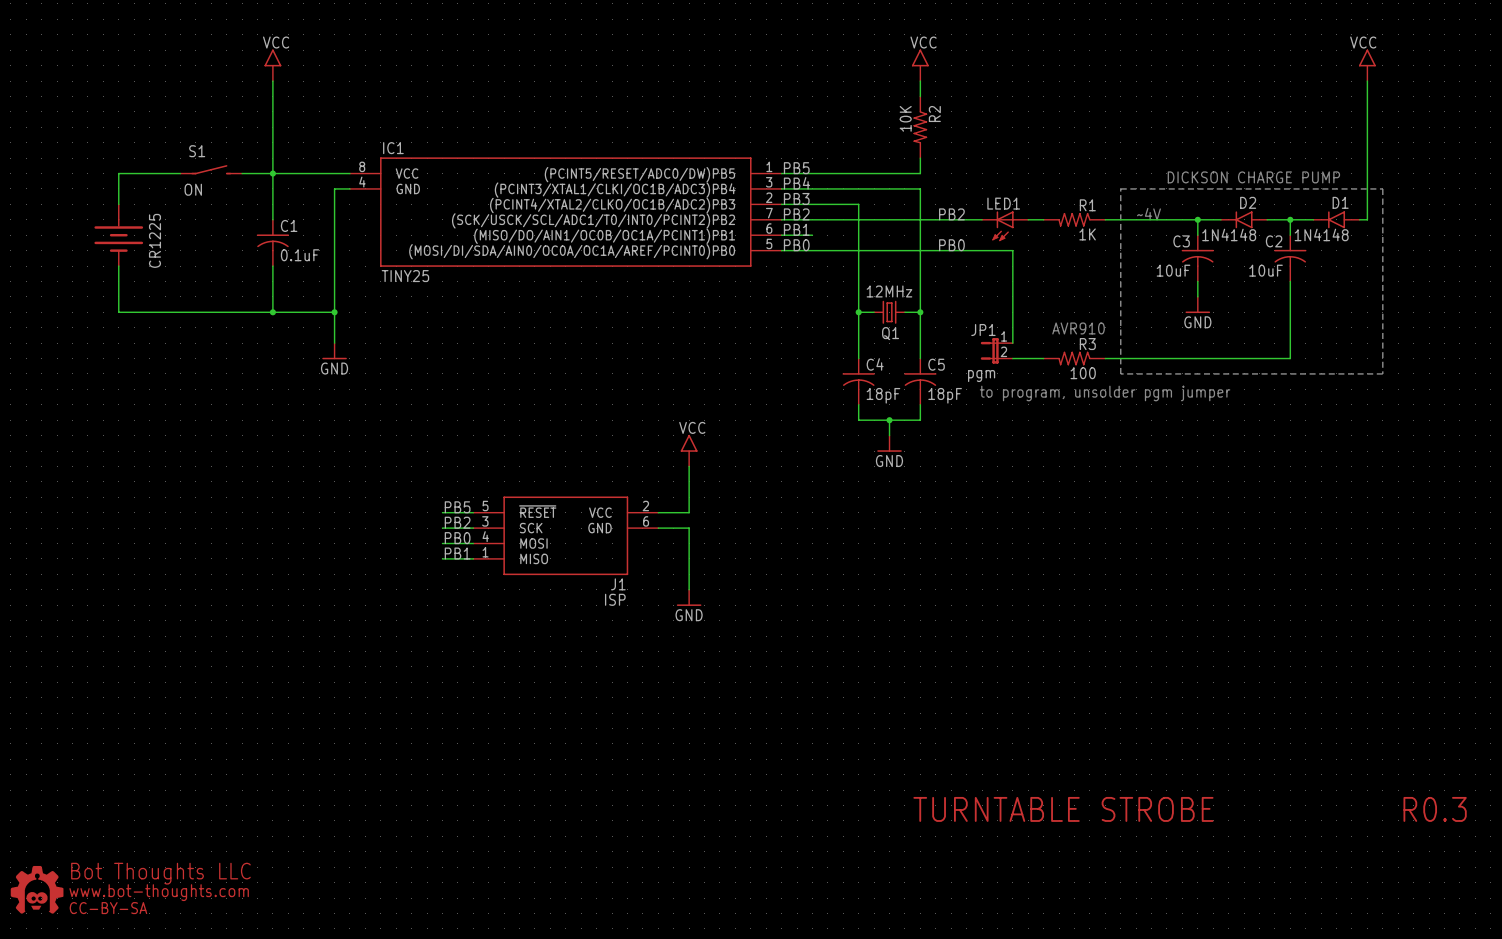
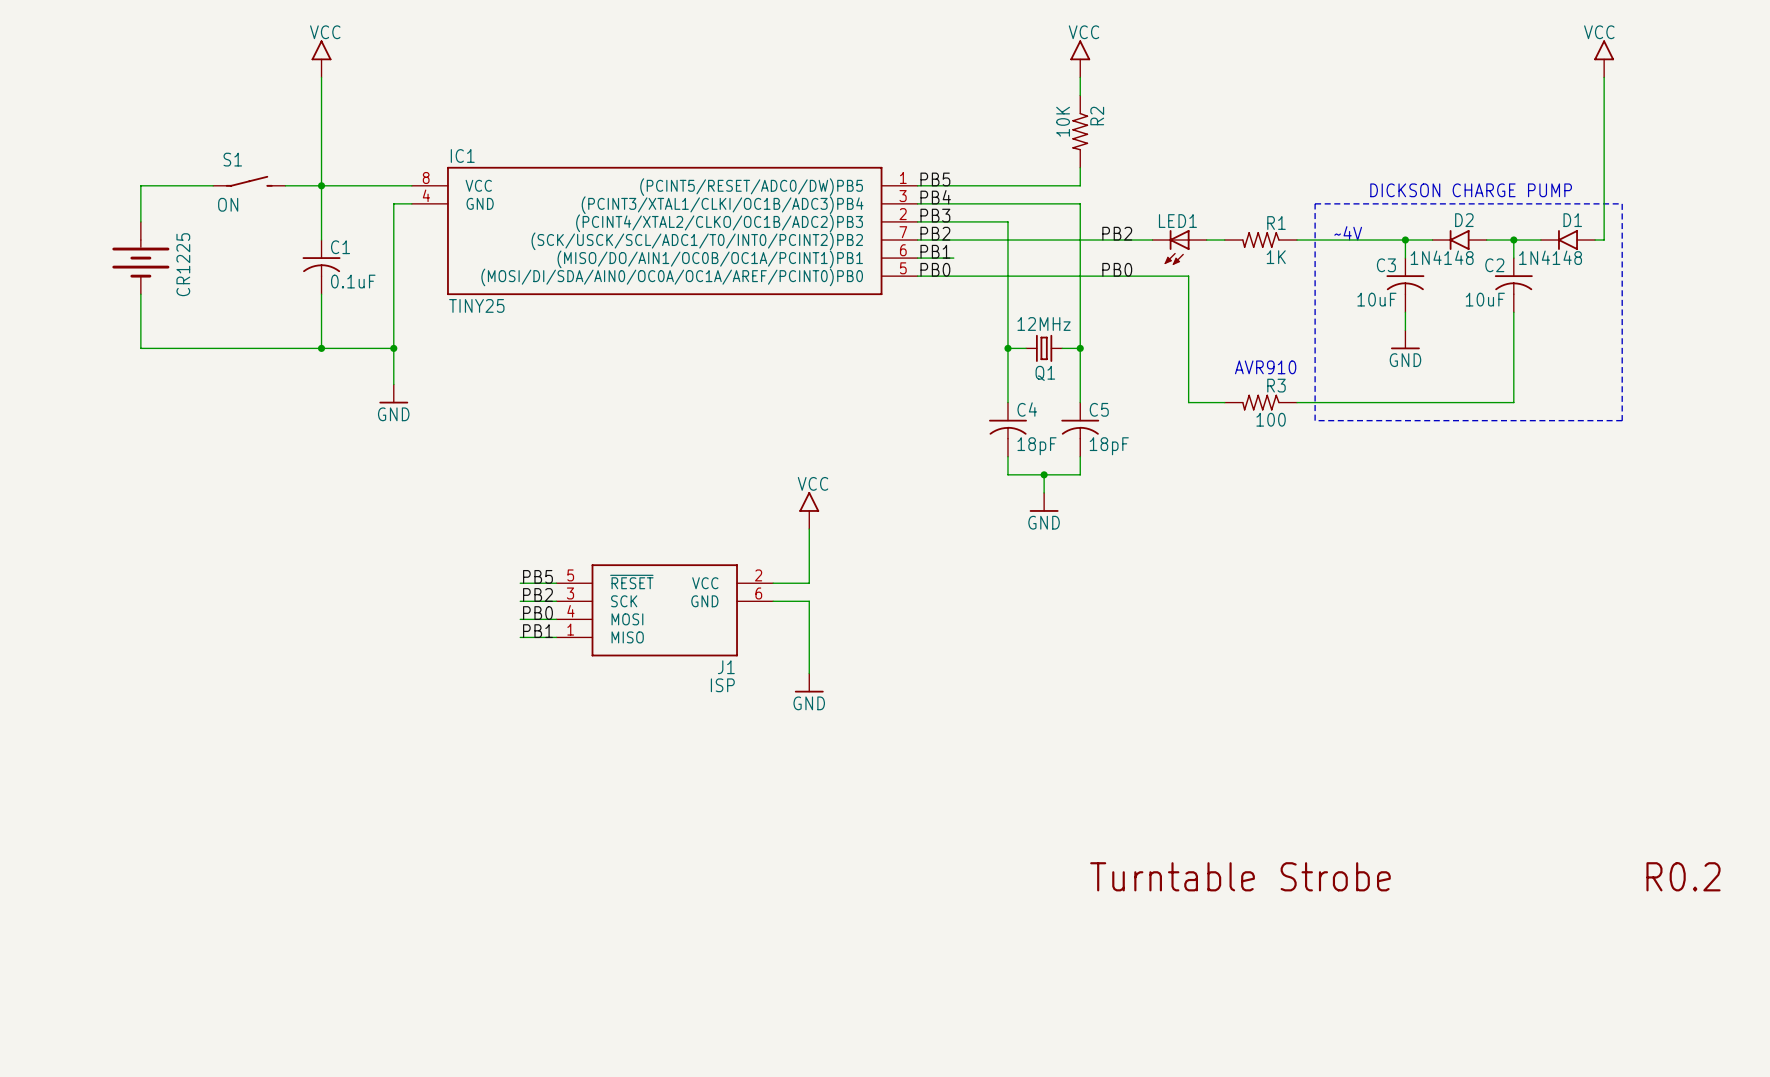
wire: none -> (1188, 384) (1188, 402)
JP1: pgm (996, 350) -> none
text: to program, unsolder pgm jumper (1105, 393) -> none
text: none -> Turntable Strobe (1240, 876)
text: TURNTABLE STROBE (1063, 809) -> none
text: R0.3 (1435, 809) -> R0.2 (1683, 876)
part: (37, 889) -> none

